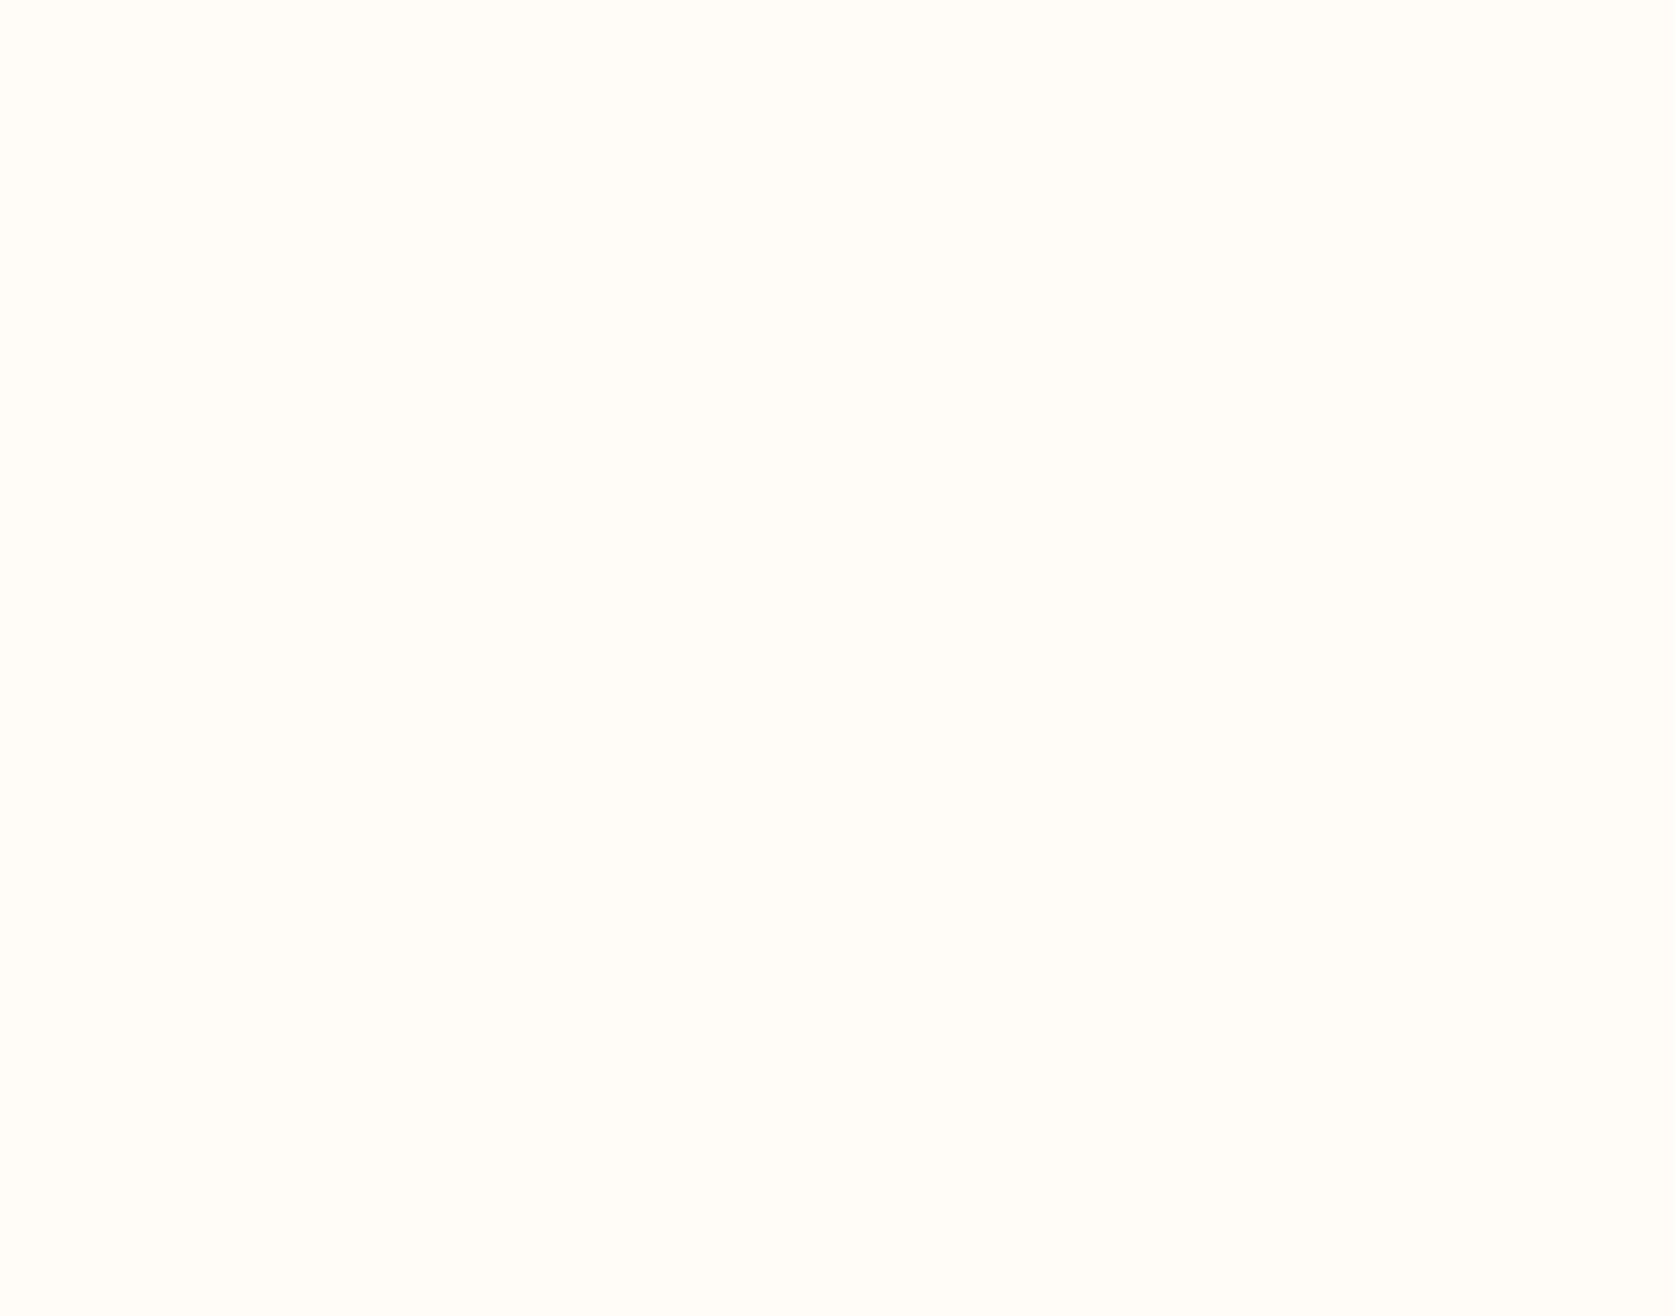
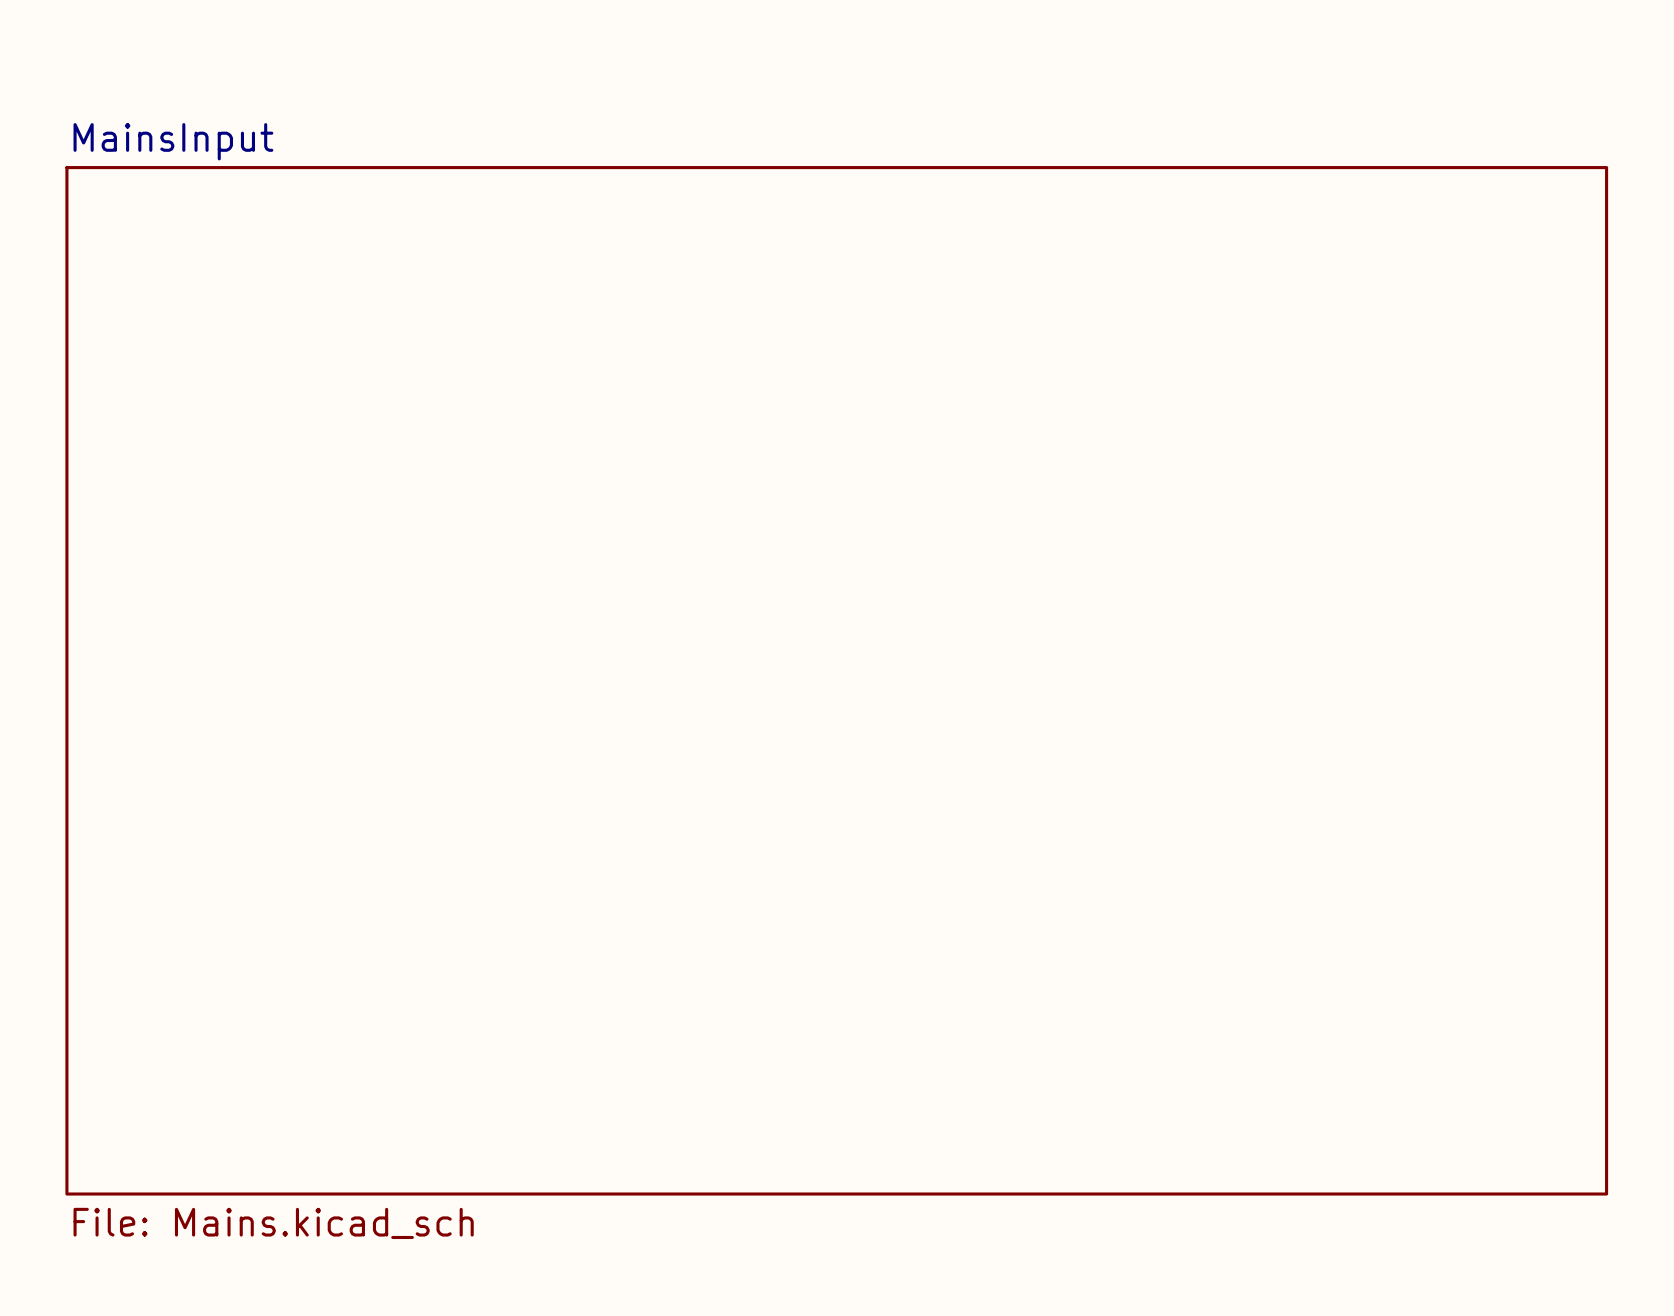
sheet MainsInput: none -> File: Mains.kicad_sch (836, 680)

